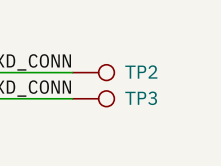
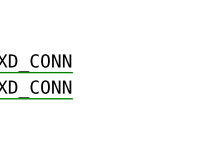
TP2: (93, 72) -> none
TP3: (93, 98) -> none

